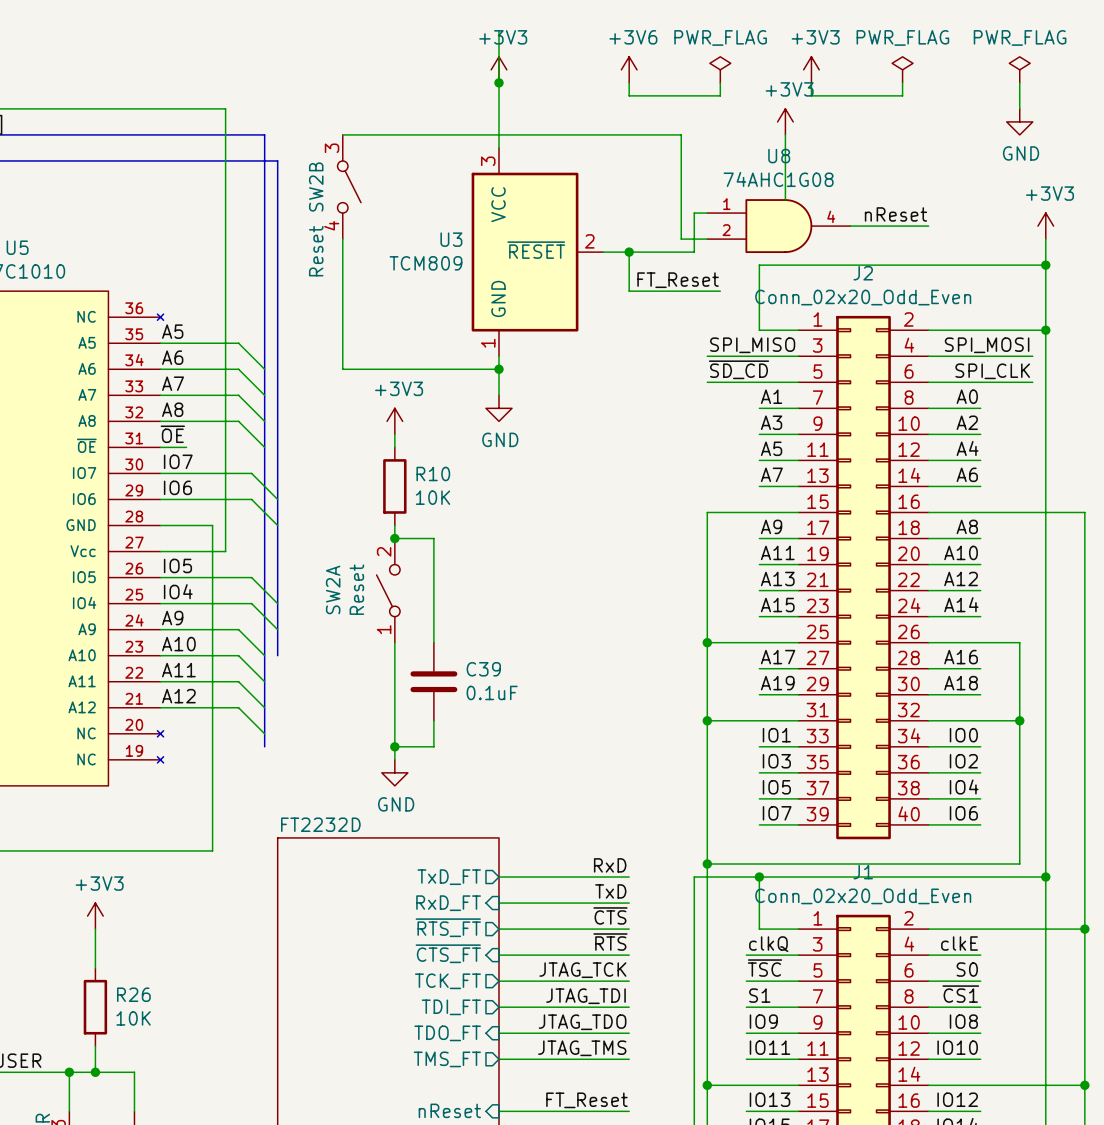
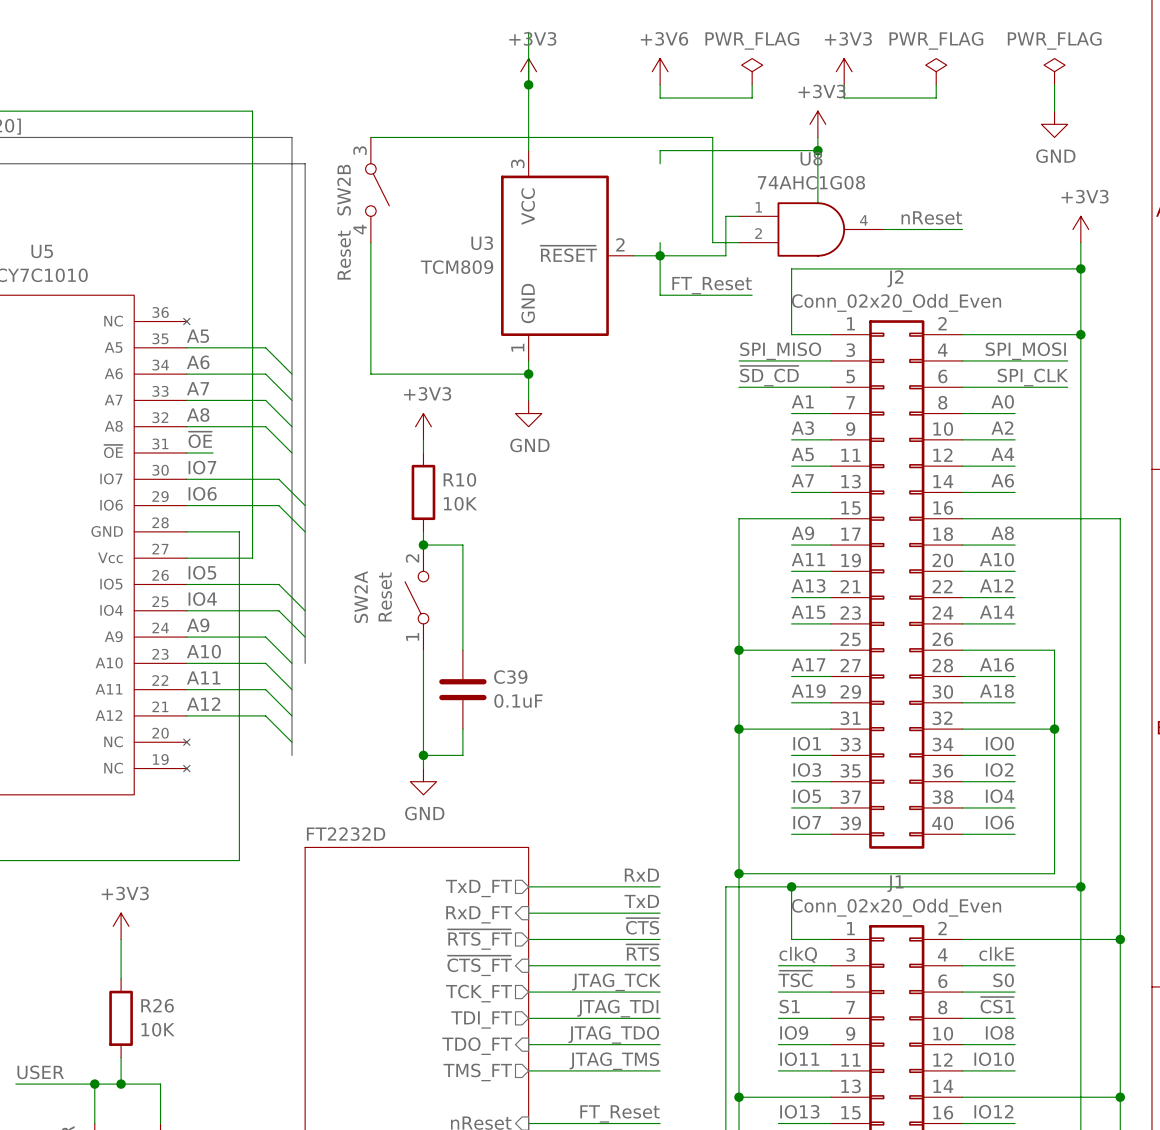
wire: none -> (817, 150) (660, 150) (660, 163)
junction: none -> (817, 150)
wire: none -> (660, 242) (660, 255)

